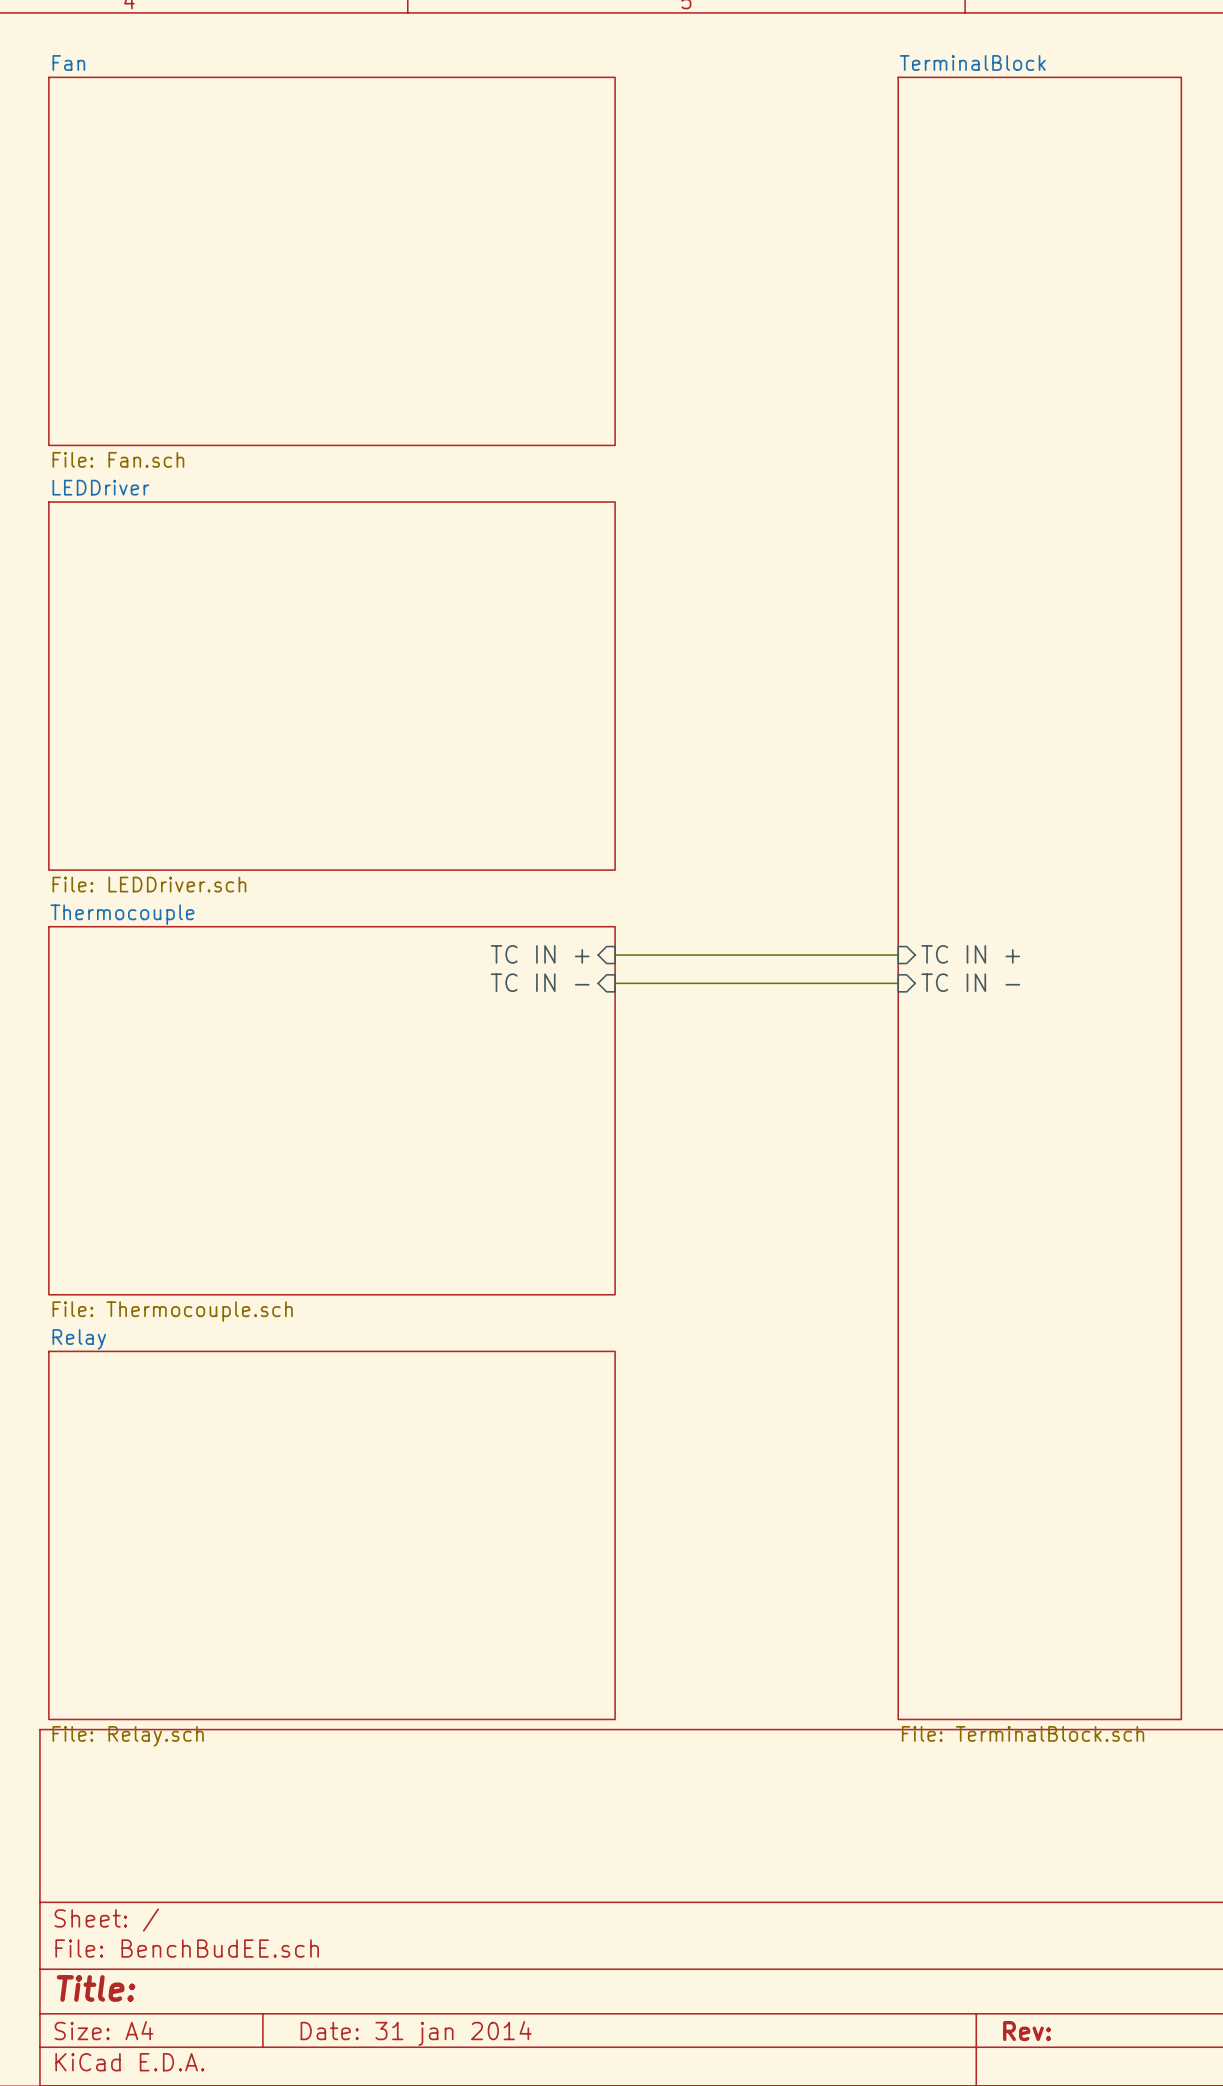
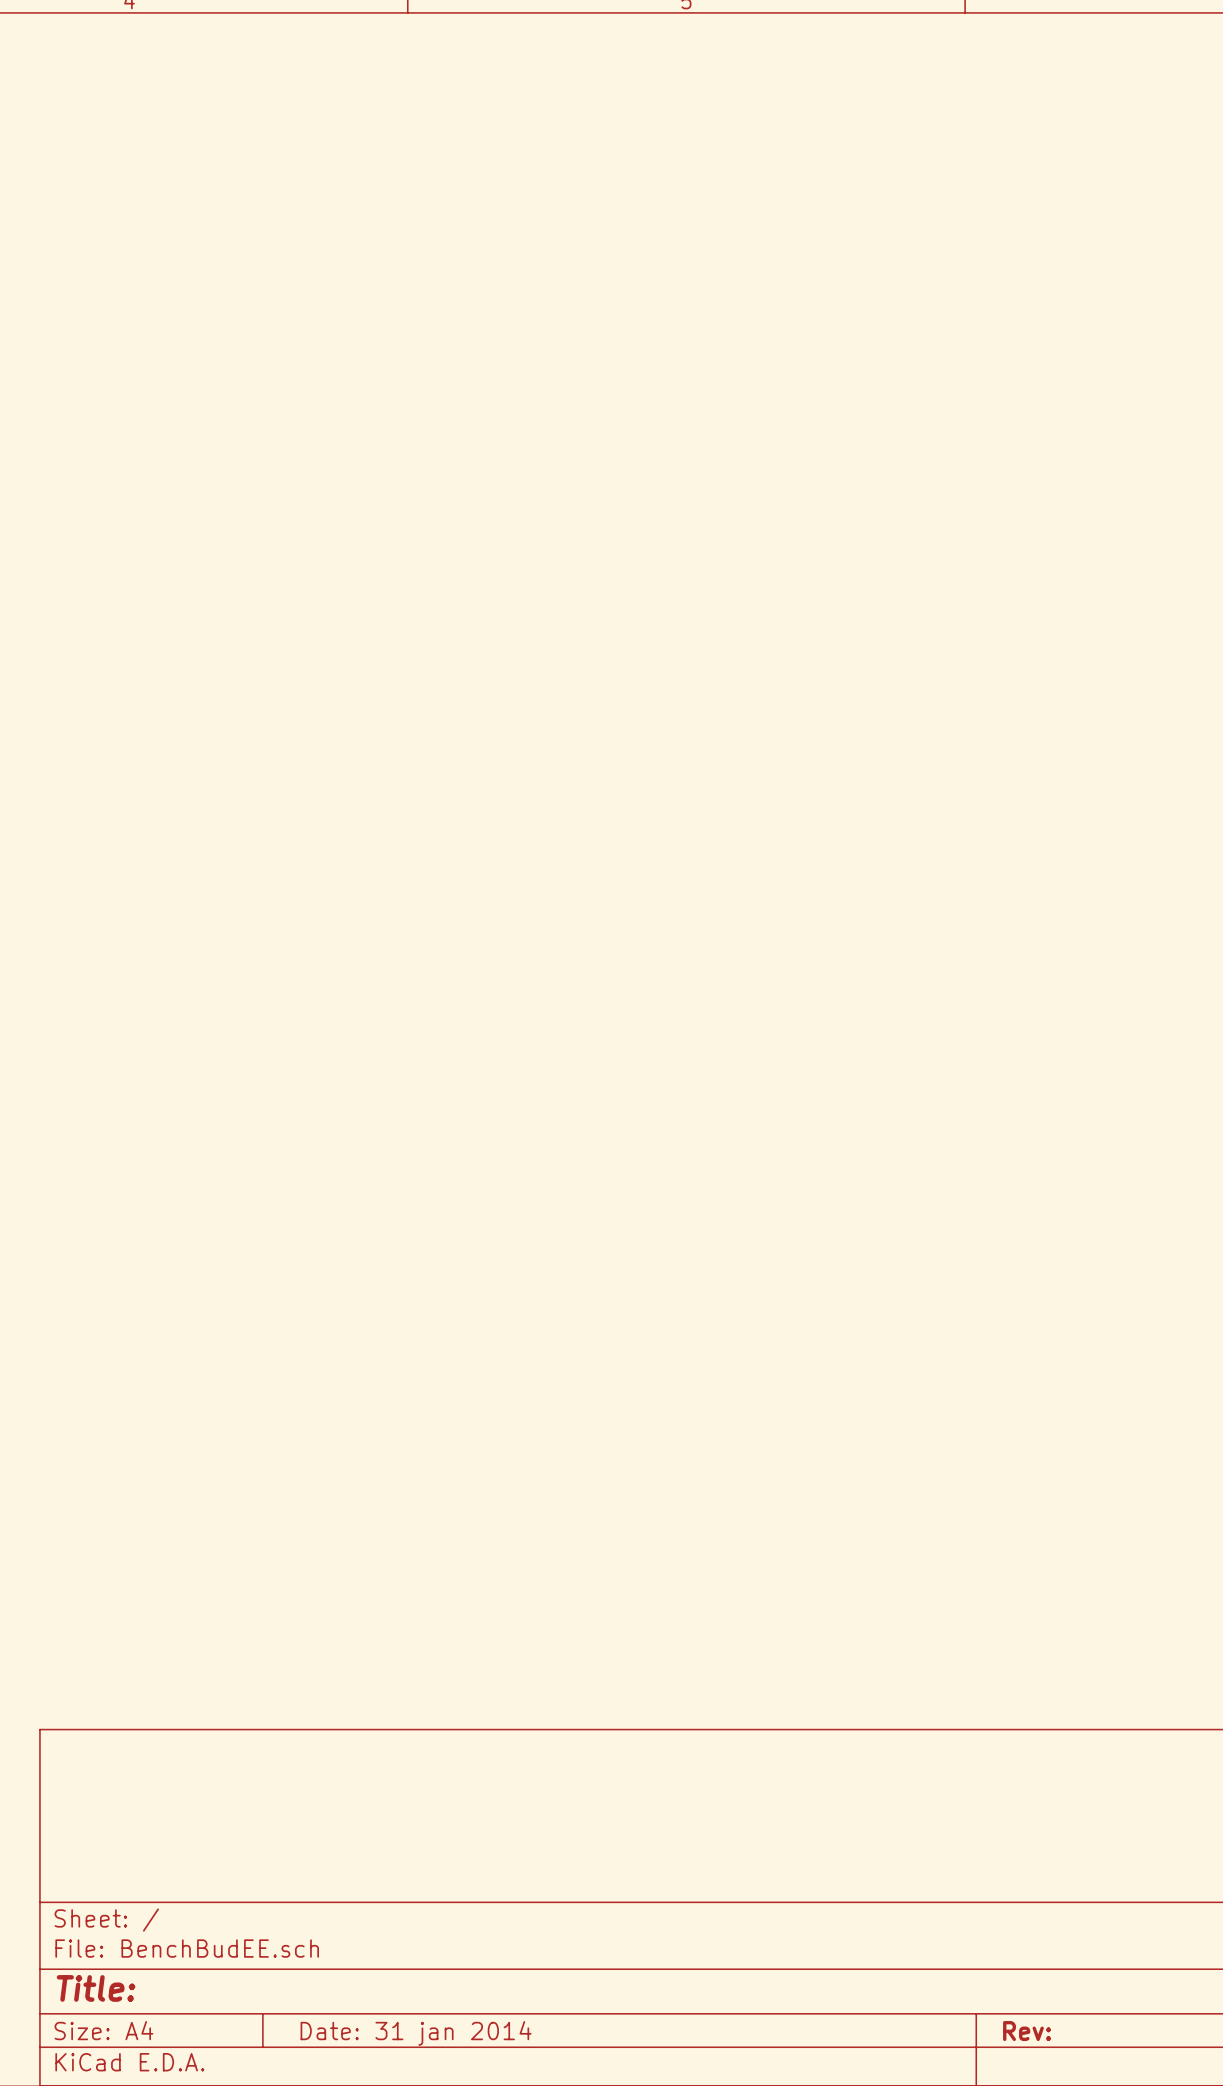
sheet Fan: File: Fan.sch (331, 261) -> none
sheet LEDDriver: File: LEDDriver.sch (331, 686) -> none
sheet TerminalBlock: File: TerminalBlock.sch (1039, 898) -> none
sheet pin: TC IN + (540, 954) -> none
sheet pin: TC IN + (970, 954) -> none
wire: (615, 955) (898, 955) -> none
sheet pin: TC IN - (540, 982) -> none
sheet pin: TC IN - (970, 982) -> none
wire: (615, 983) (898, 983) -> none
sheet Thermocouple: File: Thermocouple.sch (331, 1110) -> none
sheet Relay: File: Relay.sch (331, 1535) -> none

